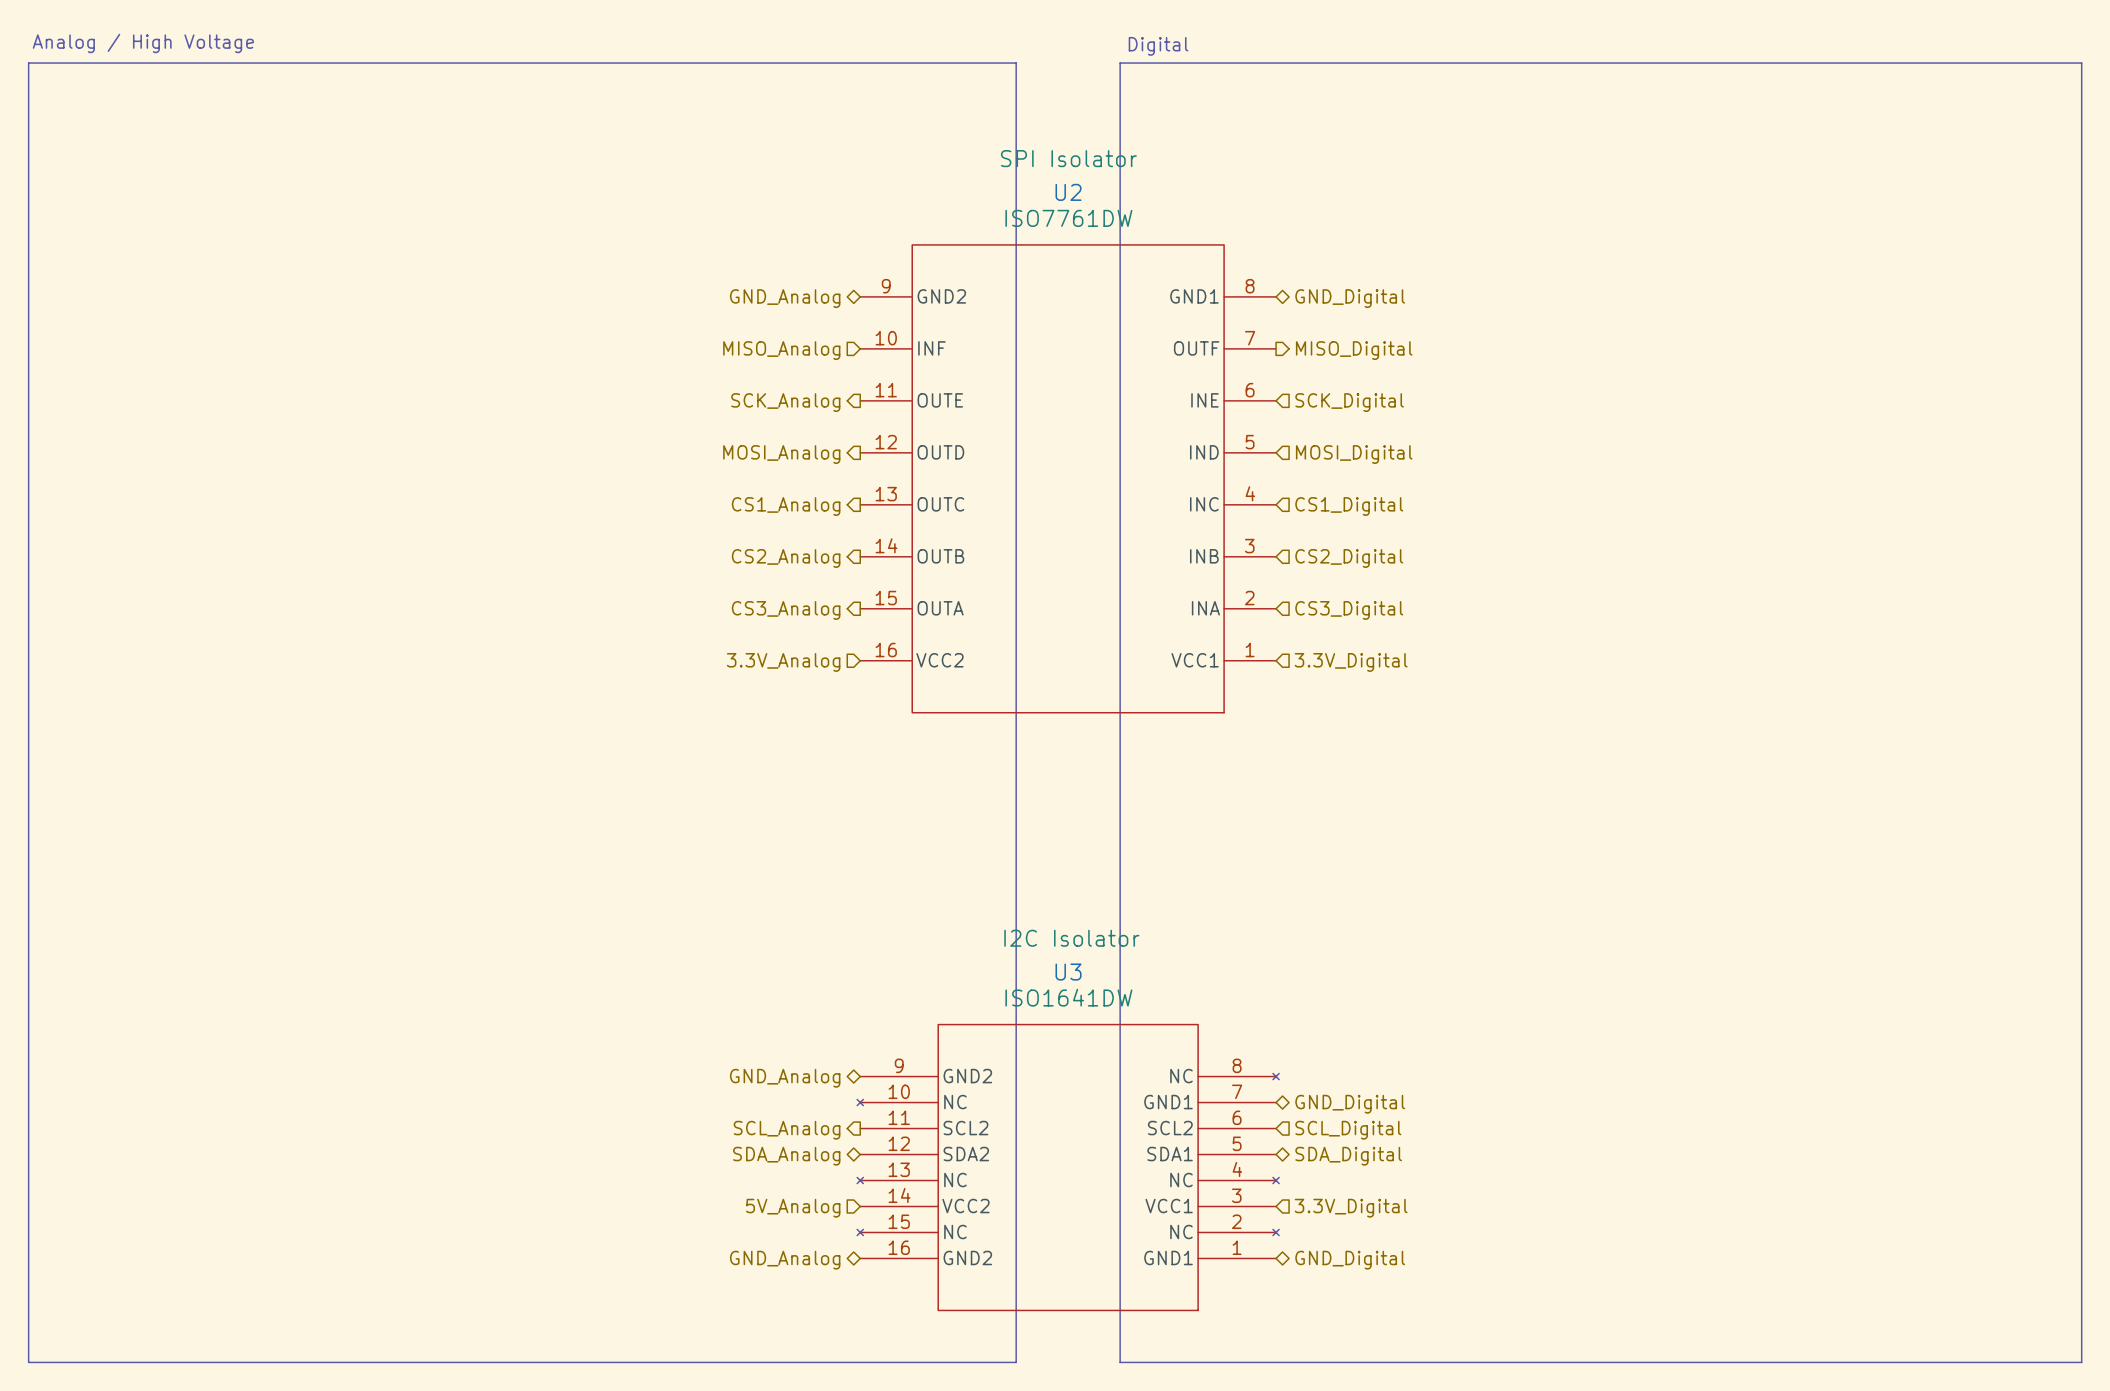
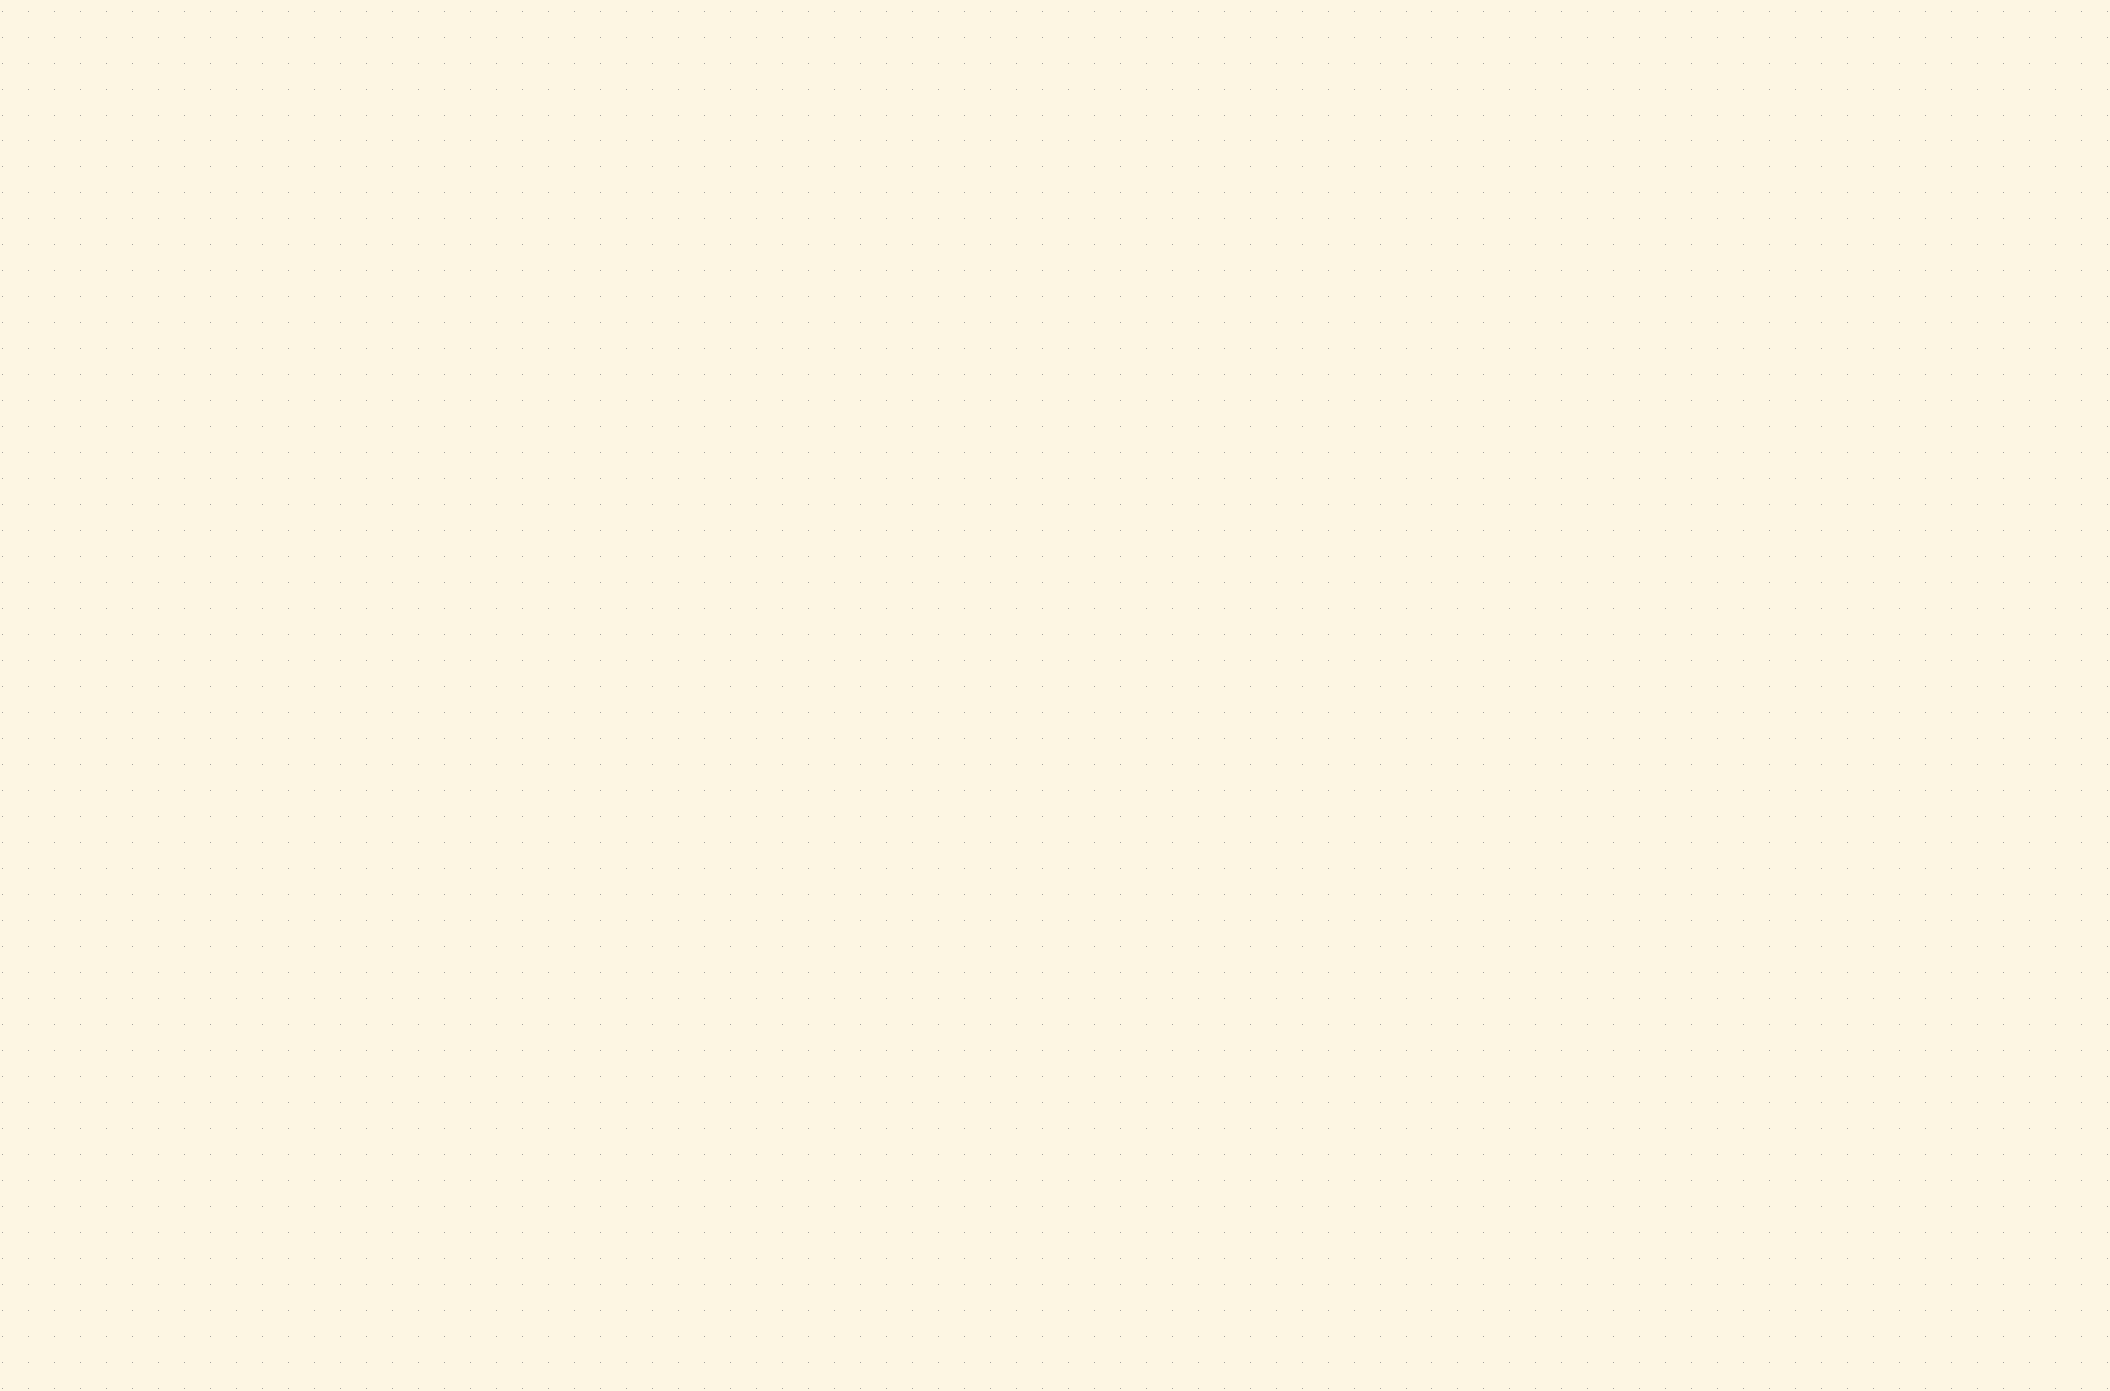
text: Analog / High Voltage (143, 43) -> none
text: Digital (1158, 46) -> none
line: (28, 63) (1016, 63) (1016, 1362) (28, 1362) (28, 63) -> none
line: (1120, 63) (2081, 63) (2081, 1362) (1120, 1362) (1120, 63) -> none
hierarchical label: GND_Analog (785, 298) -> none
hierarchical label: GND_Digital (1350, 298) -> none
hierarchical label: MISO_Analog (781, 350) -> none
hierarchical label: MISO_Digital (1354, 350) -> none
hierarchical label: SCK_Analog (785, 402) -> none
hierarchical label: SCK_Digital (1349, 402) -> none
hierarchical label: MOSI_Analog (781, 454) -> none
hierarchical label: MOSI_Digital (1354, 454) -> none
U2: ISO7761DW (1068, 478) -> none
hierarchical label: CS1_Analog (786, 506) -> none
hierarchical label: CS1_Digital (1349, 506) -> none
hierarchical label: CS2_Analog (786, 558) -> none
hierarchical label: CS2_Digital (1349, 558) -> none
hierarchical label: CS3_Analog (786, 610) -> none
hierarchical label: CS3_Digital (1349, 610) -> none
hierarchical label: 3.3V_Analog (783, 662) -> none
hierarchical label: 3.3V_Digital (1351, 662) -> none
hierarchical label: GND_Analog (785, 1078) -> none
hierarchical label: GND_Digital (1350, 1104) -> none
hierarchical label: SCL_Analog (787, 1130) -> none
hierarchical label: SCL_Digital (1348, 1130) -> none
hierarchical label: SDA_Analog (786, 1156) -> none
hierarchical label: SDA_Digital (1348, 1156) -> none
U3: ISO1641DW (1068, 1167) -> none
hierarchical label: 5V_Analog (793, 1208) -> none
hierarchical label: 3.3V_Digital (1351, 1208) -> none
hierarchical label: GND_Analog (785, 1260) -> none
hierarchical label: GND_Digital (1350, 1260) -> none

